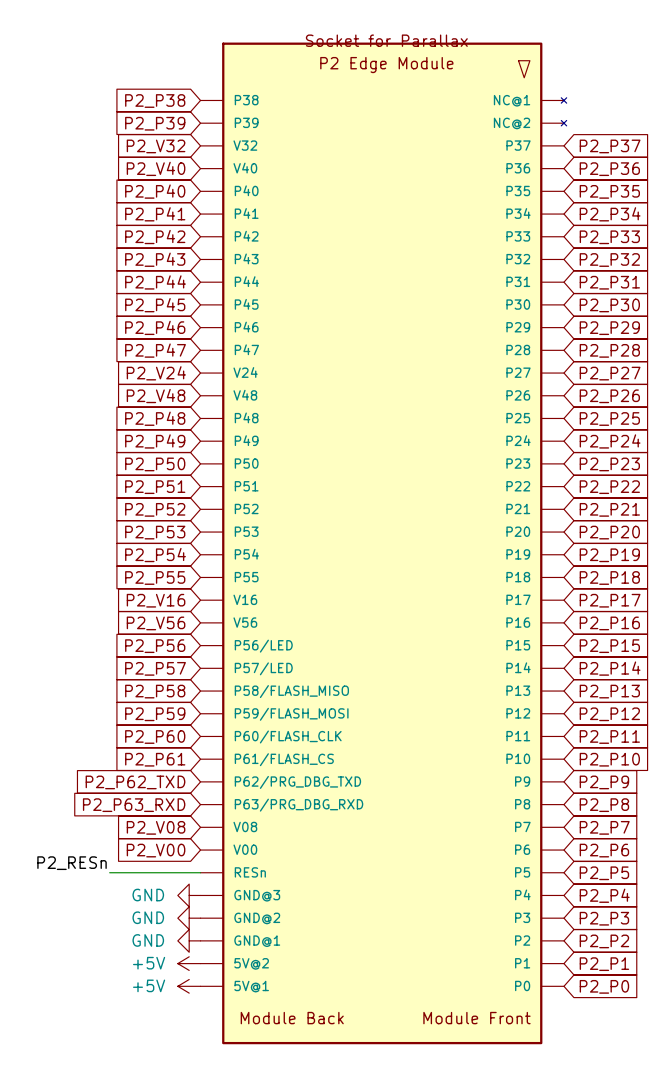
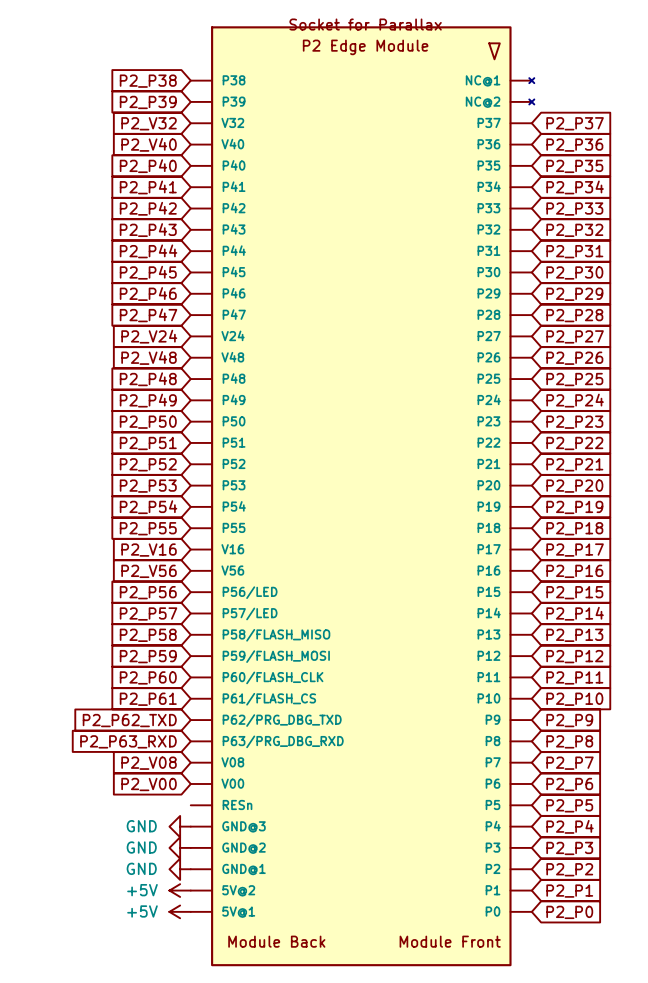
label: P2_RESn (72, 863) -> none
wire: (109, 872) (200, 872) -> none

